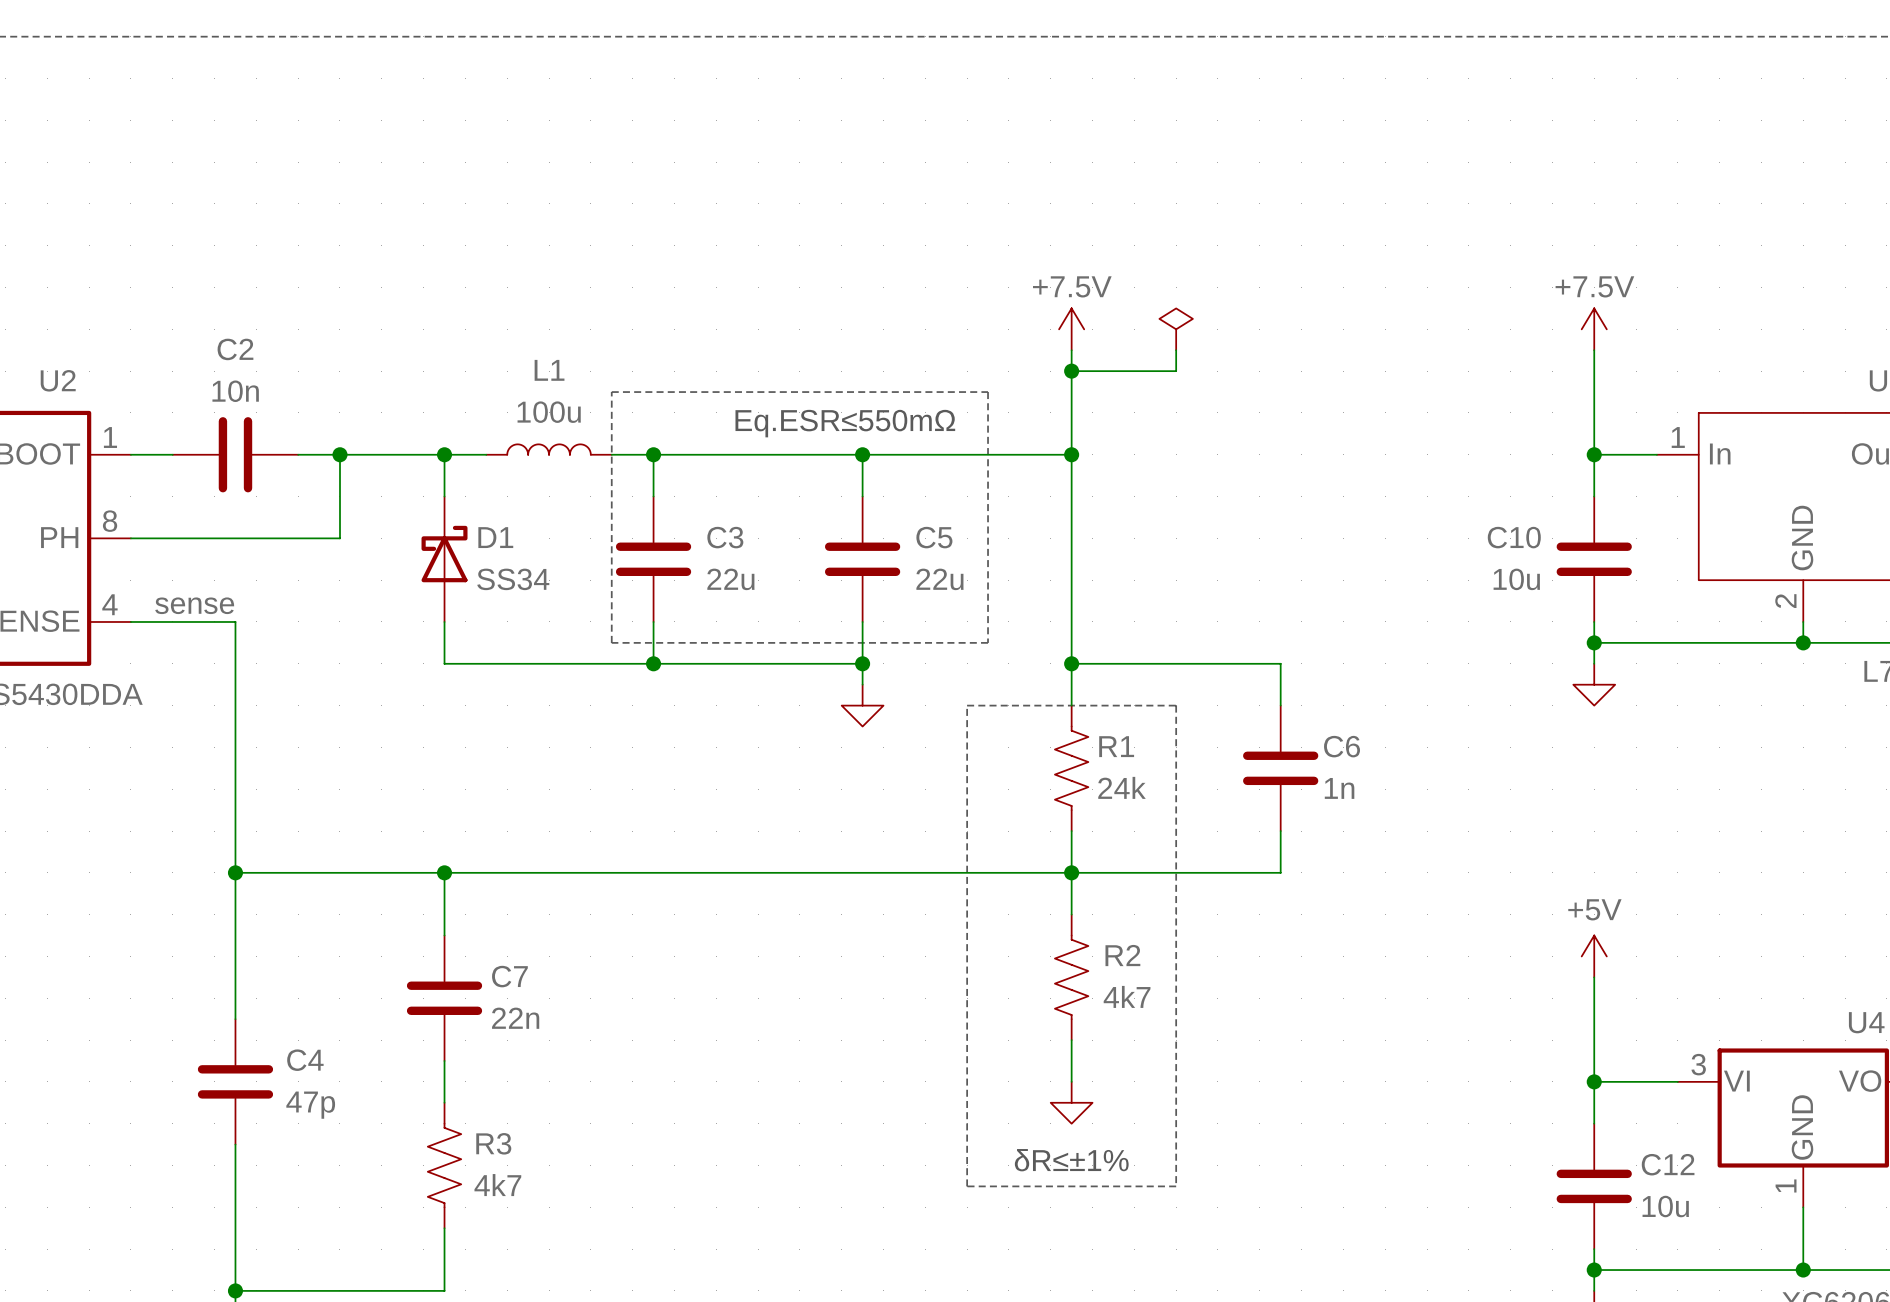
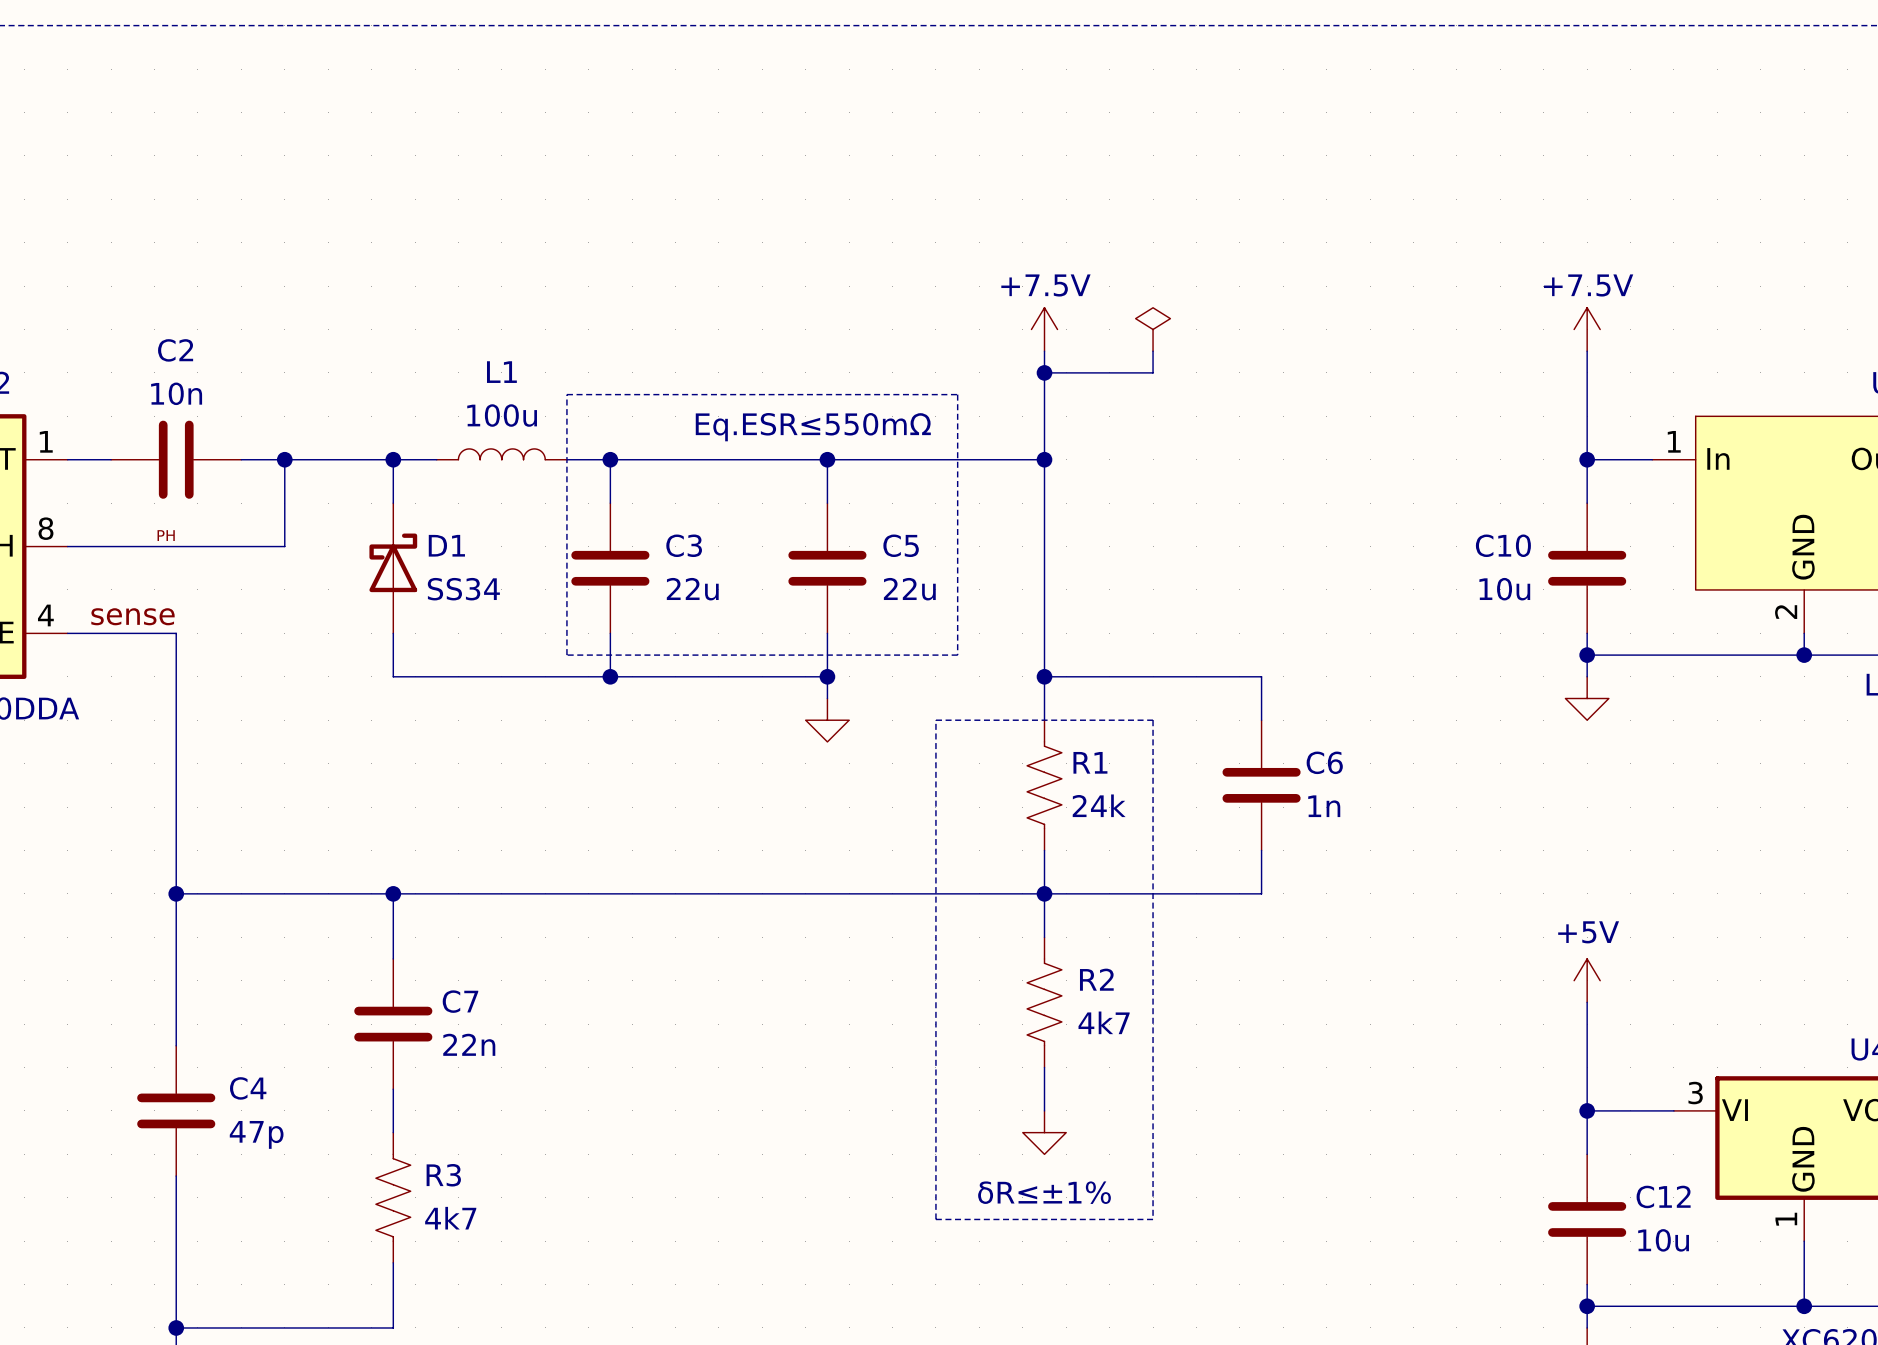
label: none -> PH (166, 535)

